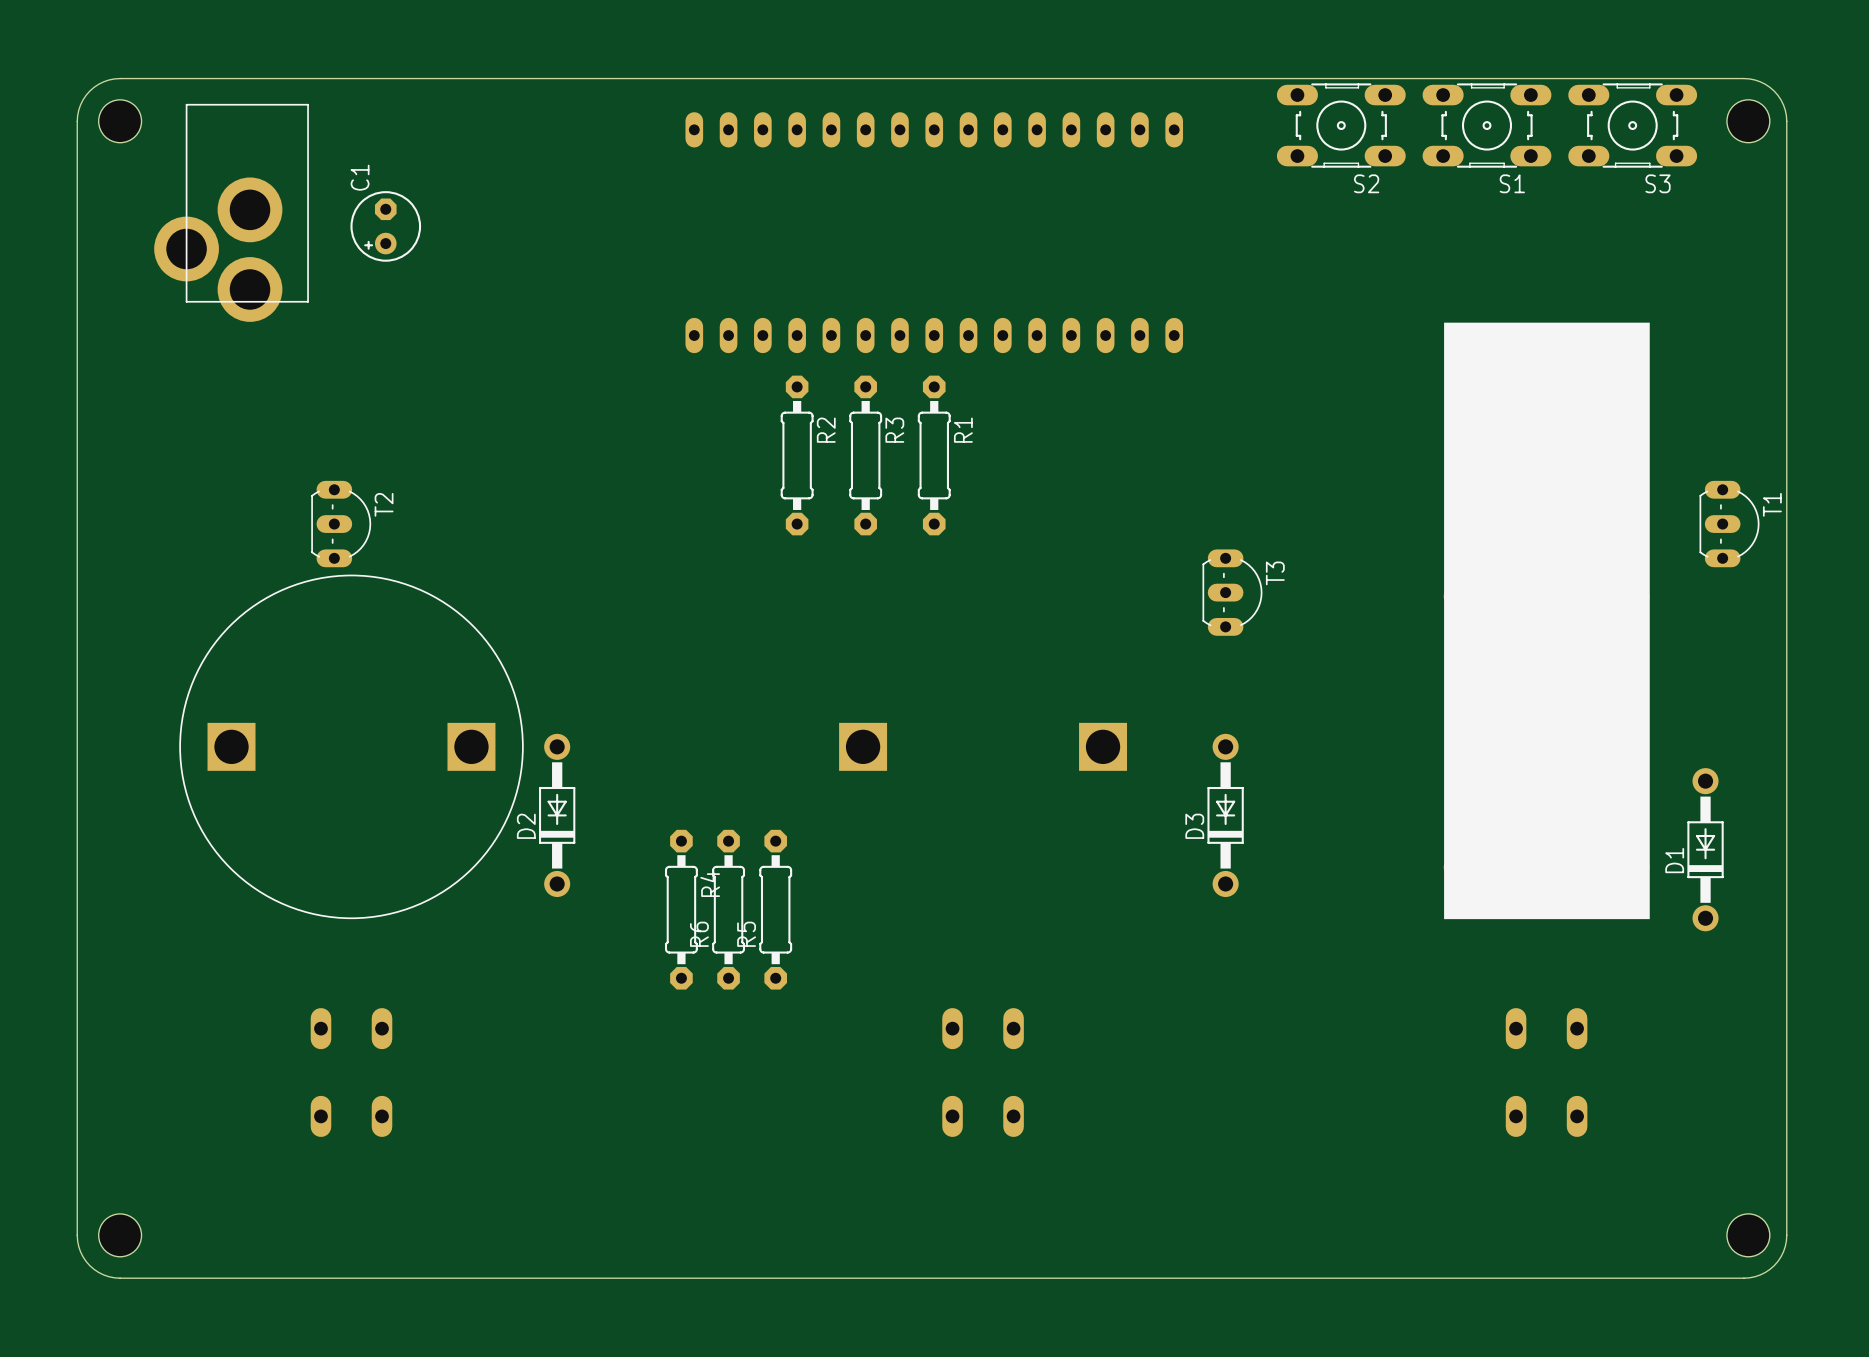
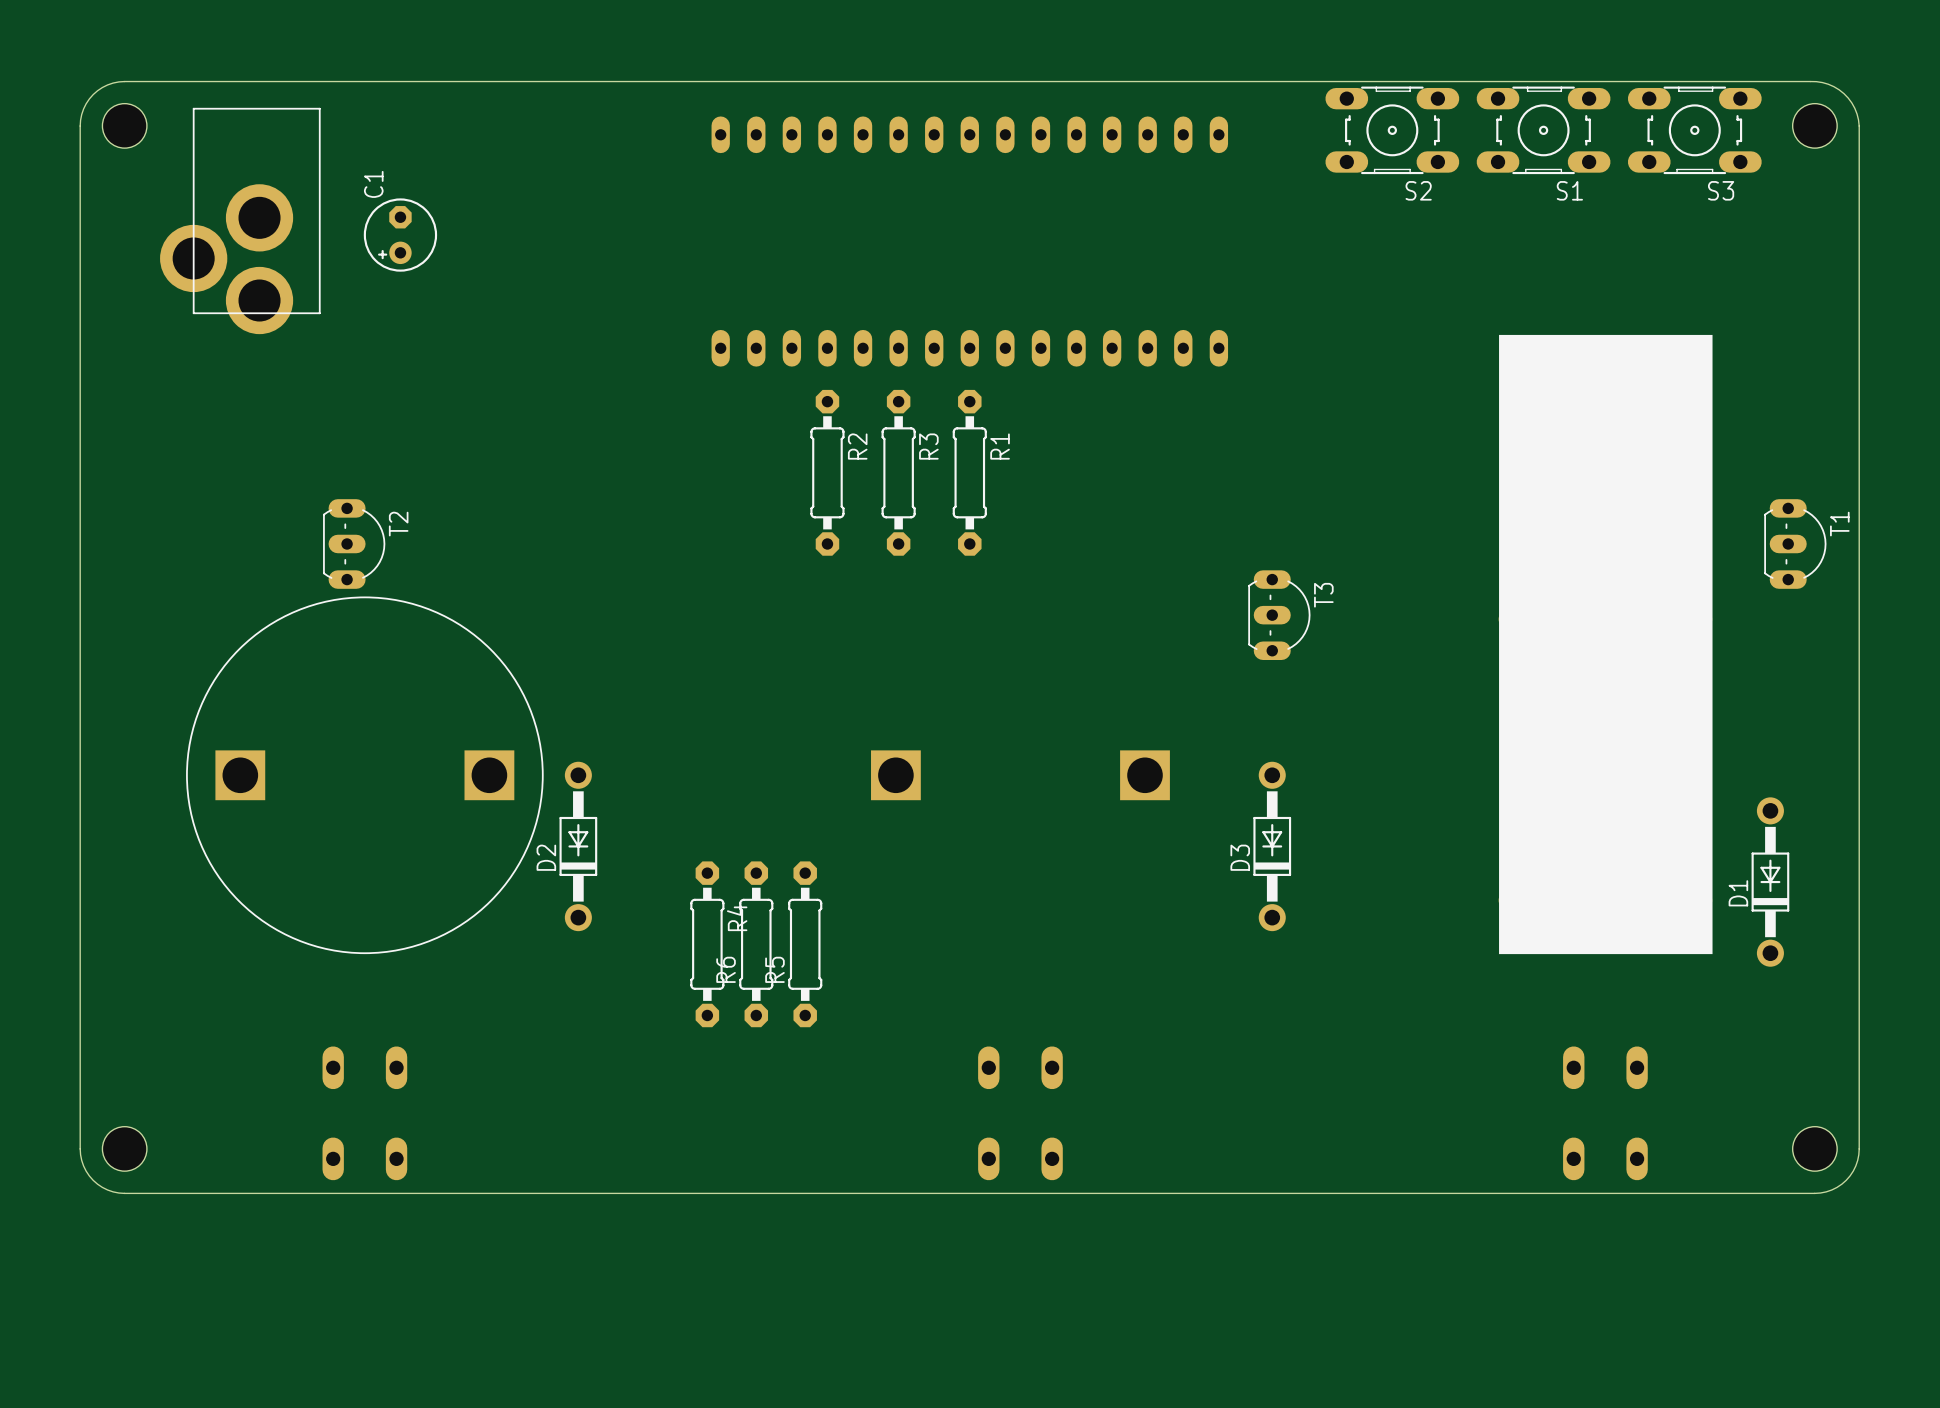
board edge: (1743, 78) (1760, 81) (1774, 91) (1783, 105) (1786, 121) (1786, 1235) (1781, 1256) (1765, 1272) (1743, 1278) (114, 1277) (103, 1274) (89, 1265) (78, 1246) (77, 1106) -> (1810, 81) (1828, 84) (1843, 93) (1854, 108) (1859, 126) (1859, 1148) (1857, 1160) (1853, 1171) (1846, 1180) (1836, 1187) (1826, 1191) (1814, 1193) (124, 1193) (107, 1190) (93, 1180) (83, 1165) (80, 1148)
hole position: (120, 1235) -> (124, 1148)
hole position: (1748, 1235) -> (1814, 1148)

